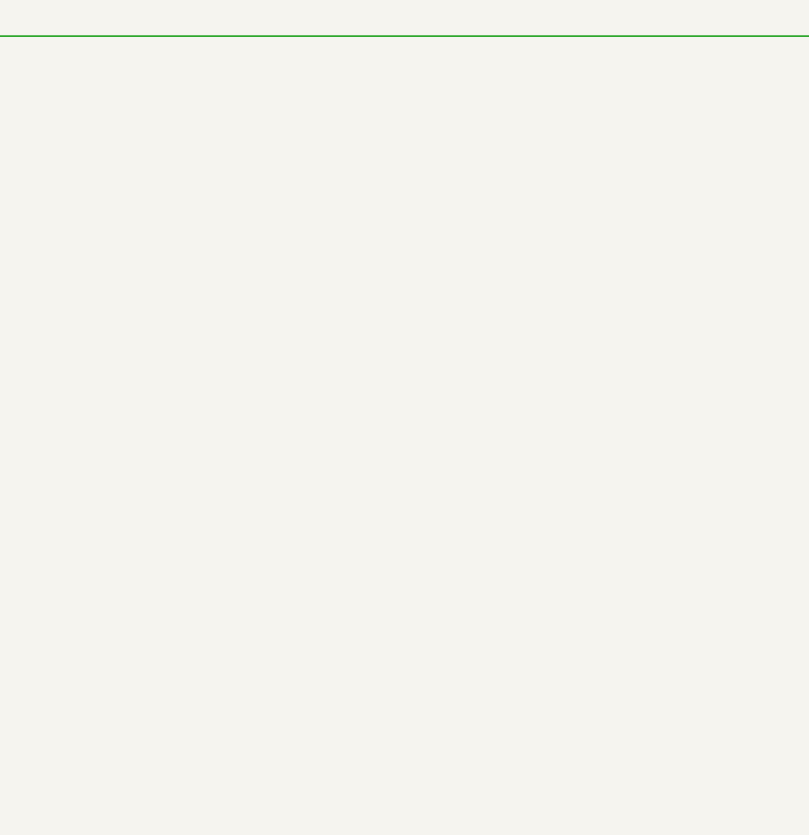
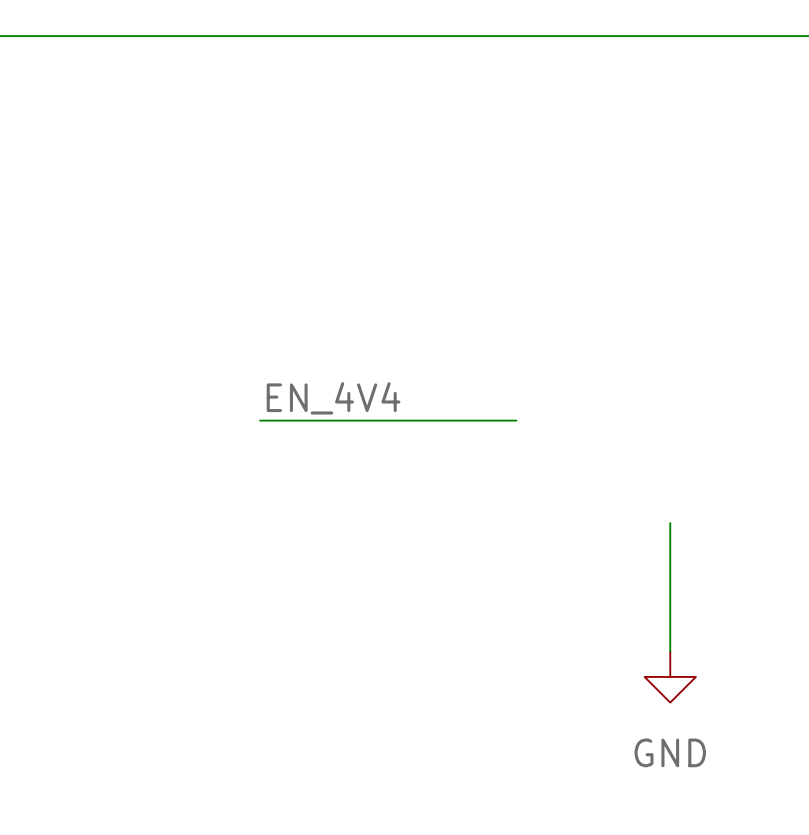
label: none -> EN_4V4 (333, 398)
wire: none -> (260, 420) (516, 420)
wire: none -> (670, 523) (670, 651)
power symbol: none -> GND (670, 676)

